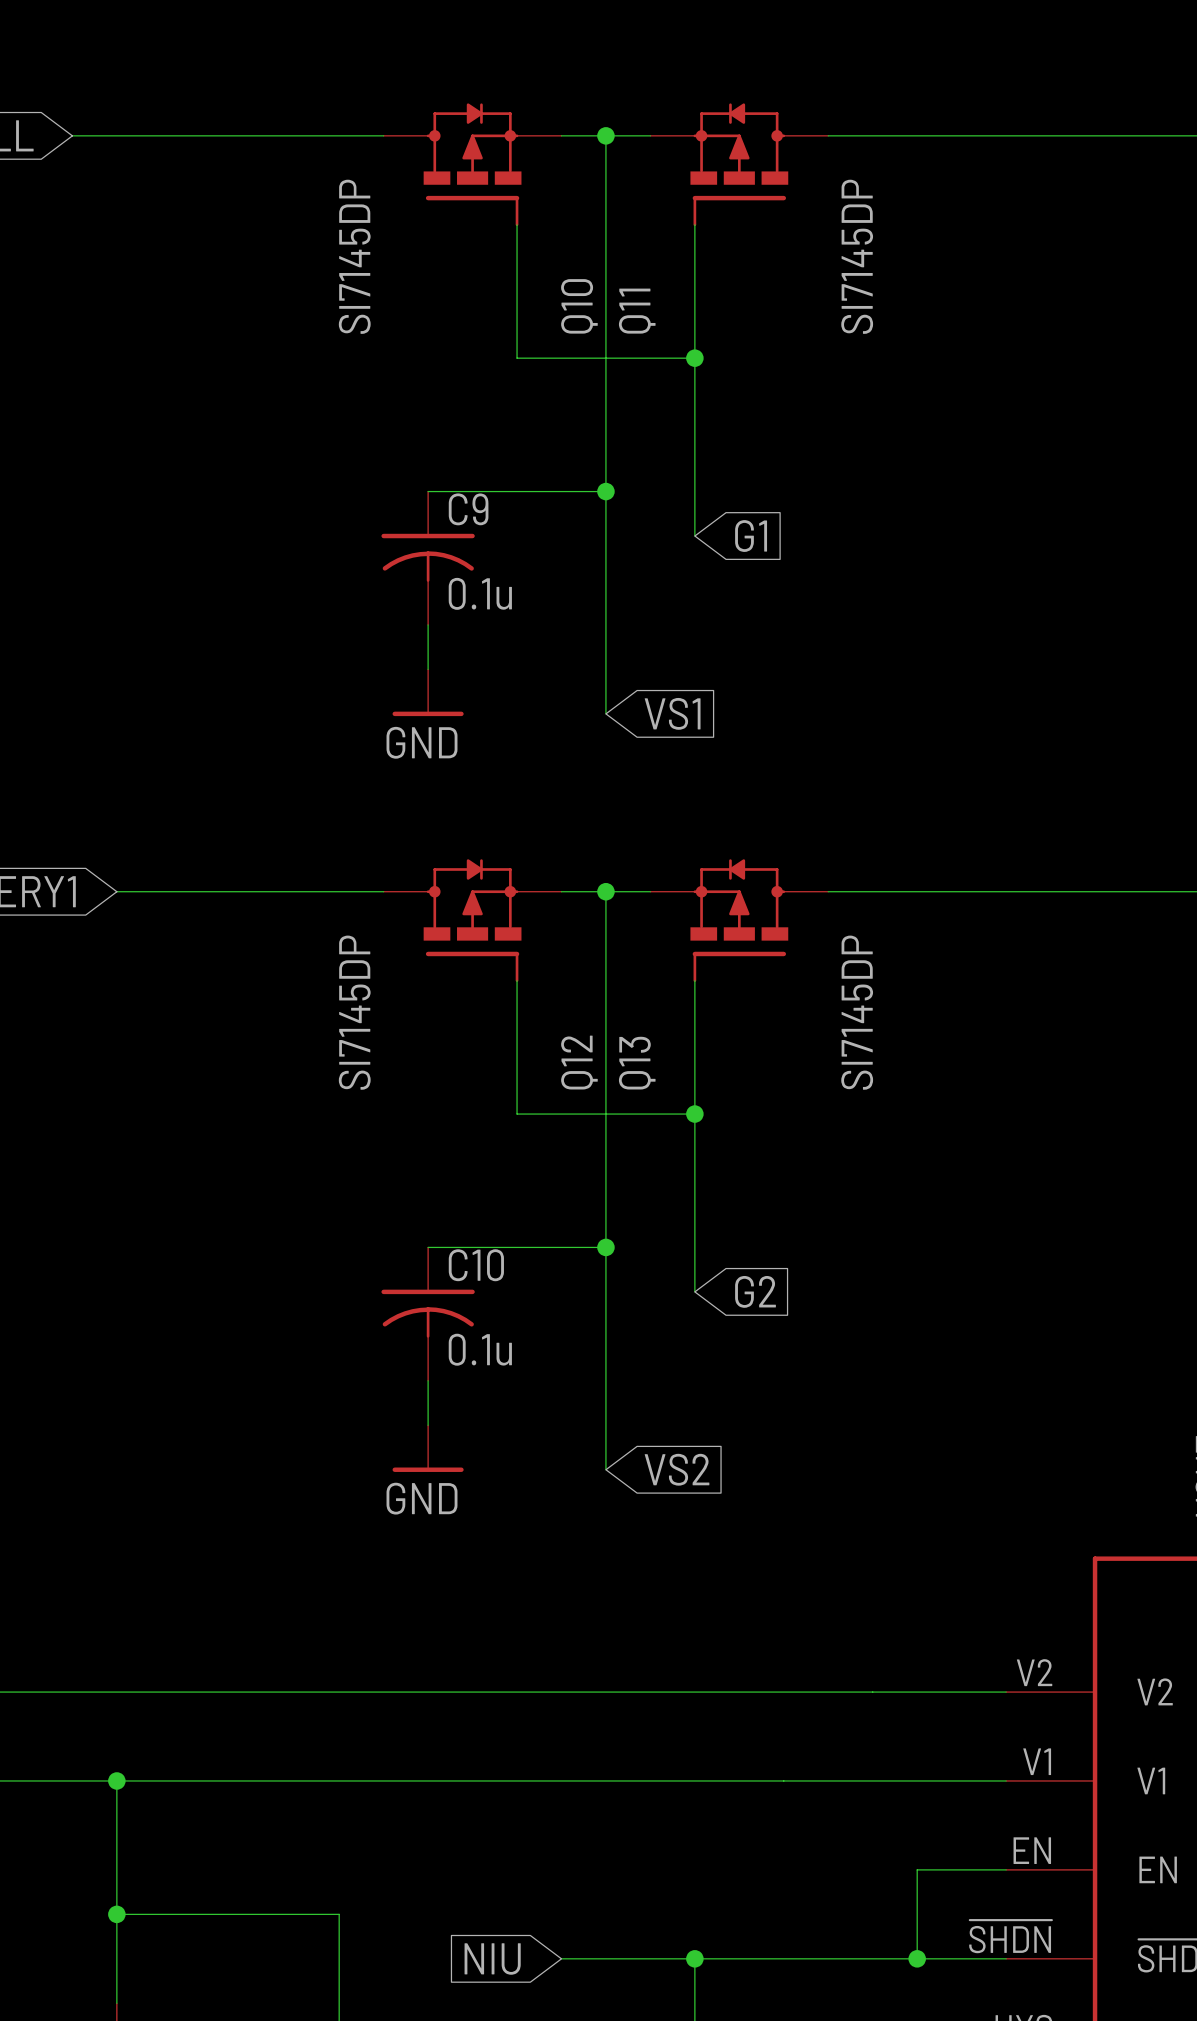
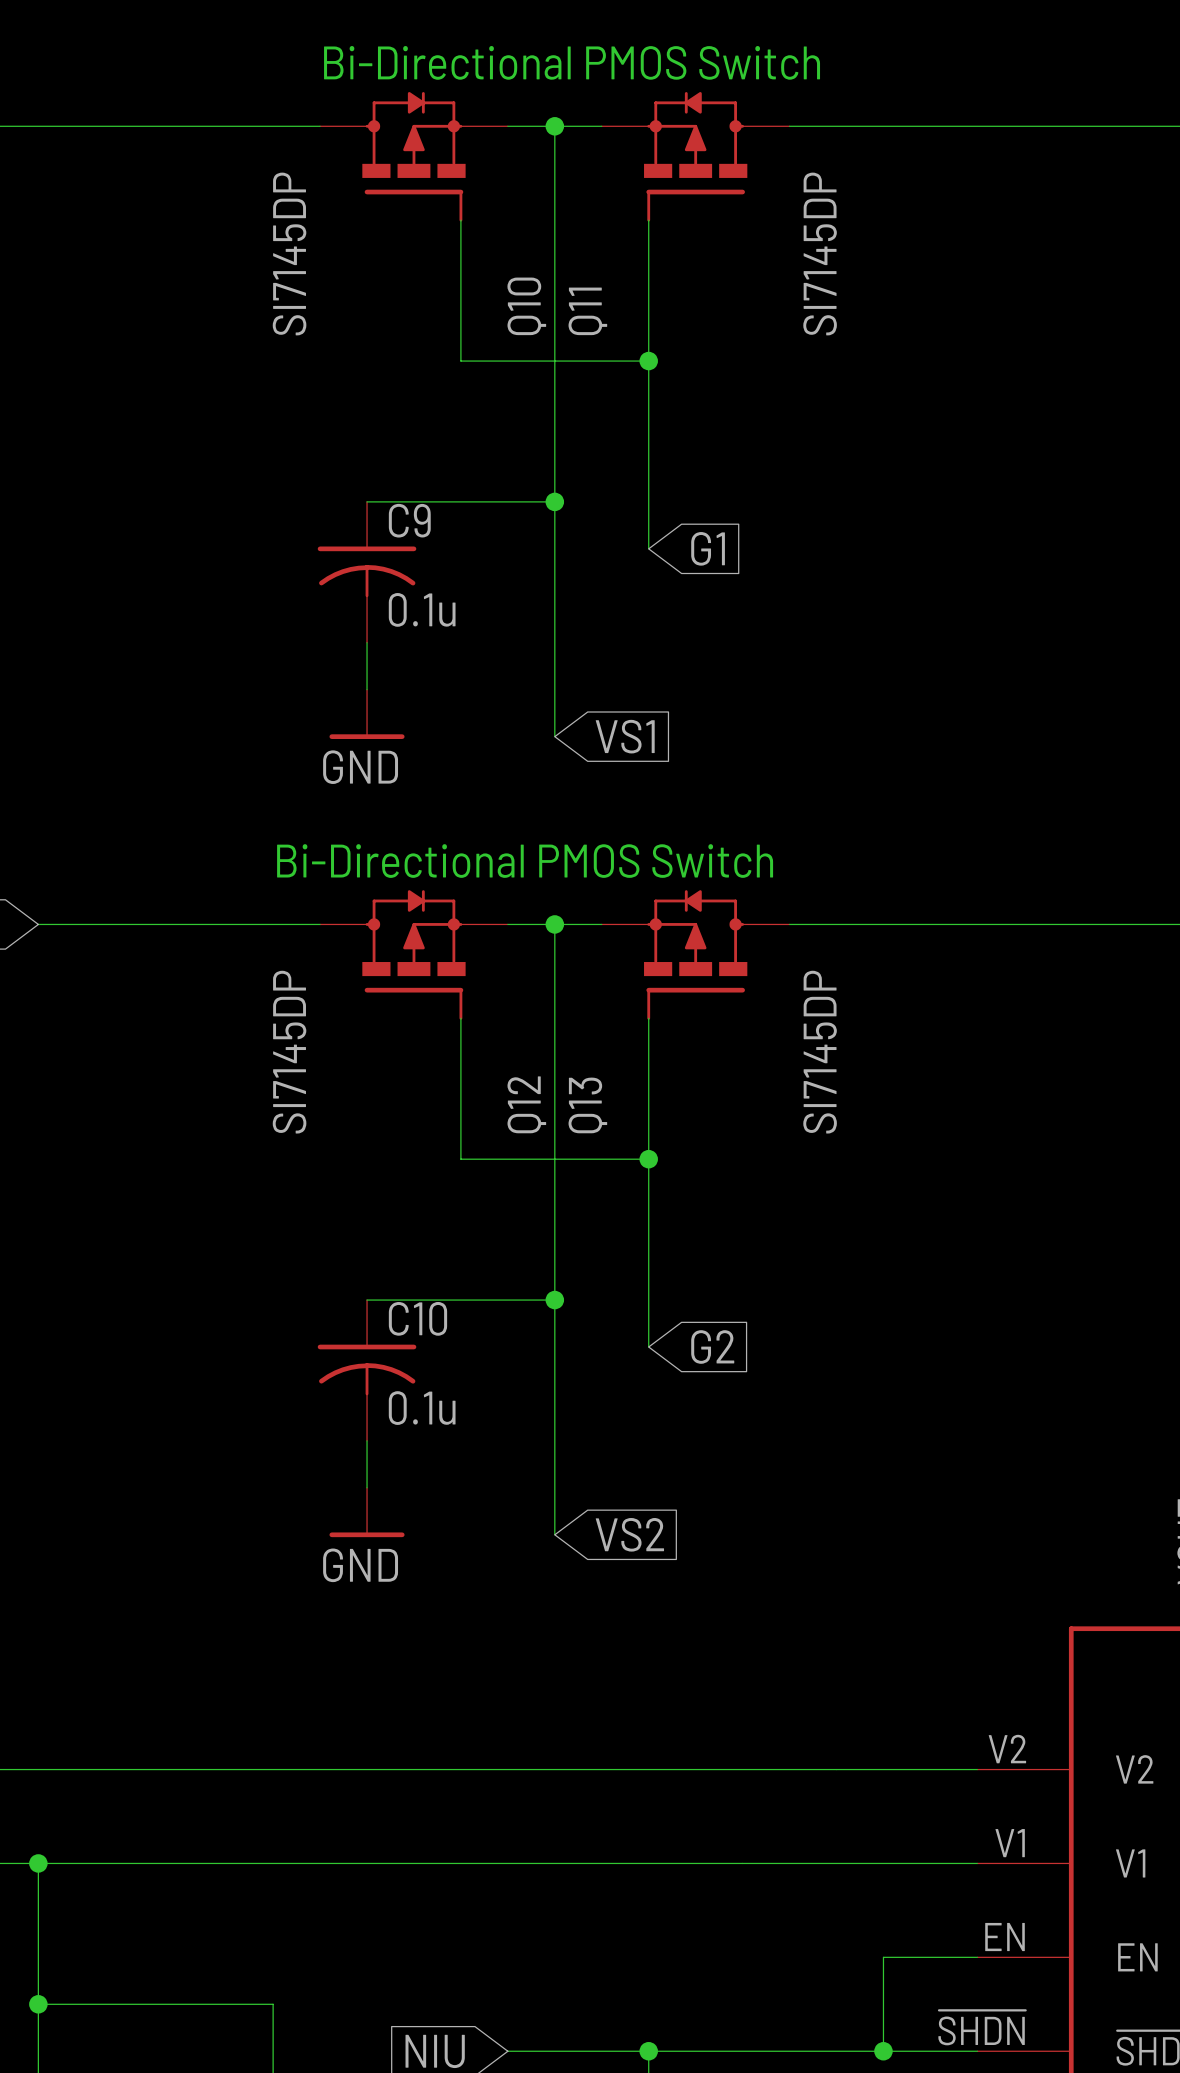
text: none -> Bi-Directional PMOS Switch (572, 62)
text: none -> Bi-Directional PMOS Switch (525, 861)

